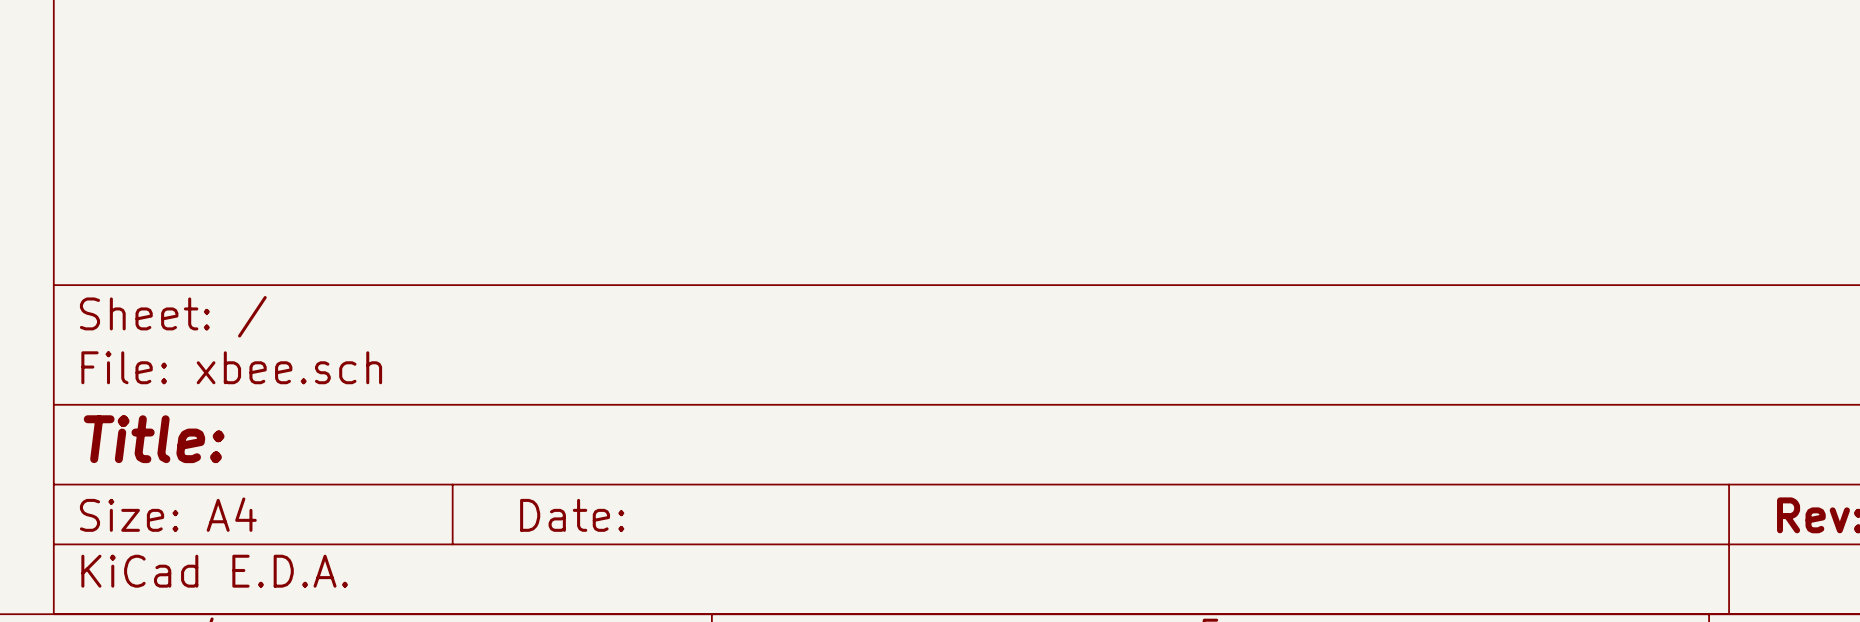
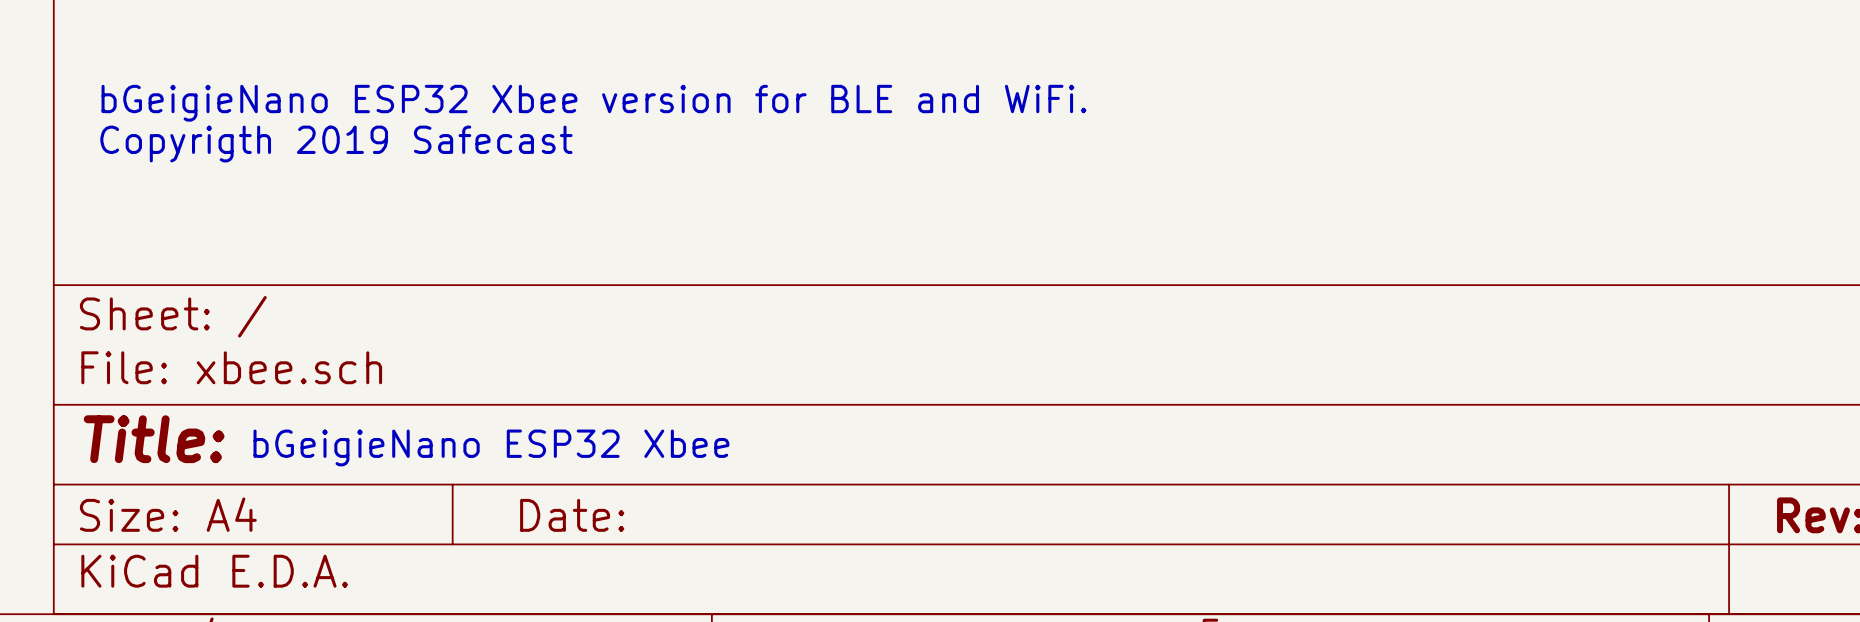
text: none -> bGeigieNano ESP32 Xbee version for BLE and WiFi. (593, 103)
text: none -> Copyrigth 2019 Safecast (336, 144)
text: none -> bGeigieNano ESP32 Xbee (491, 447)

